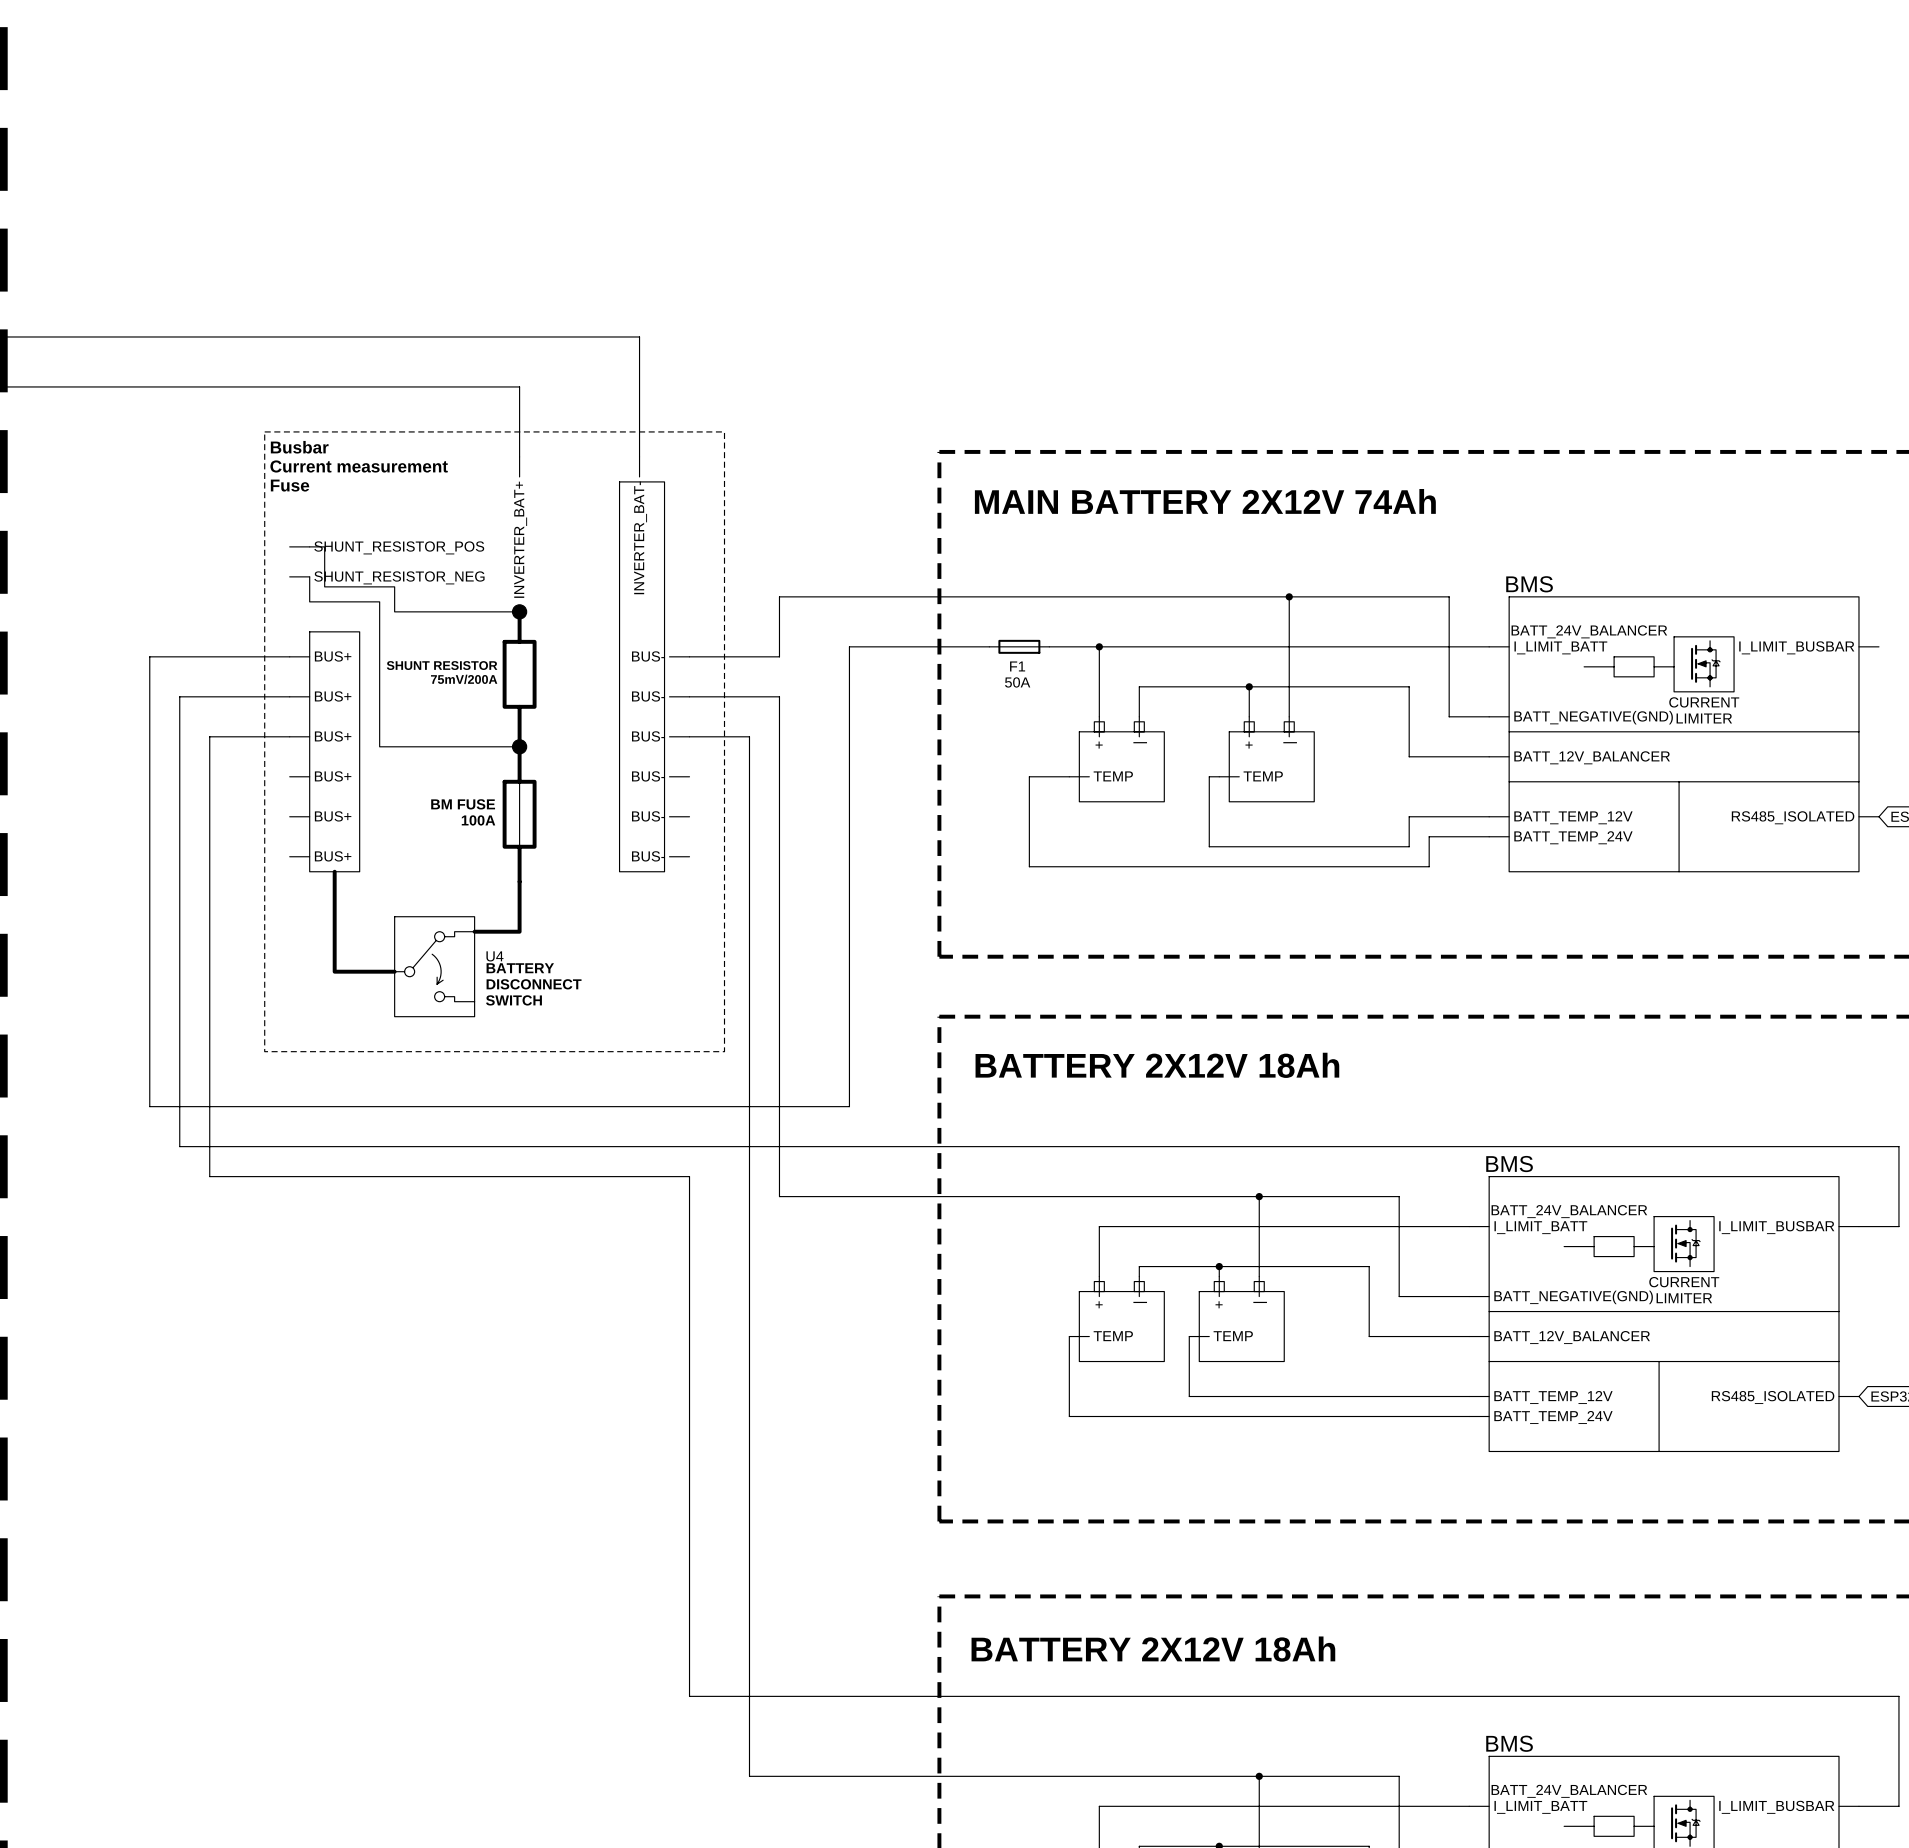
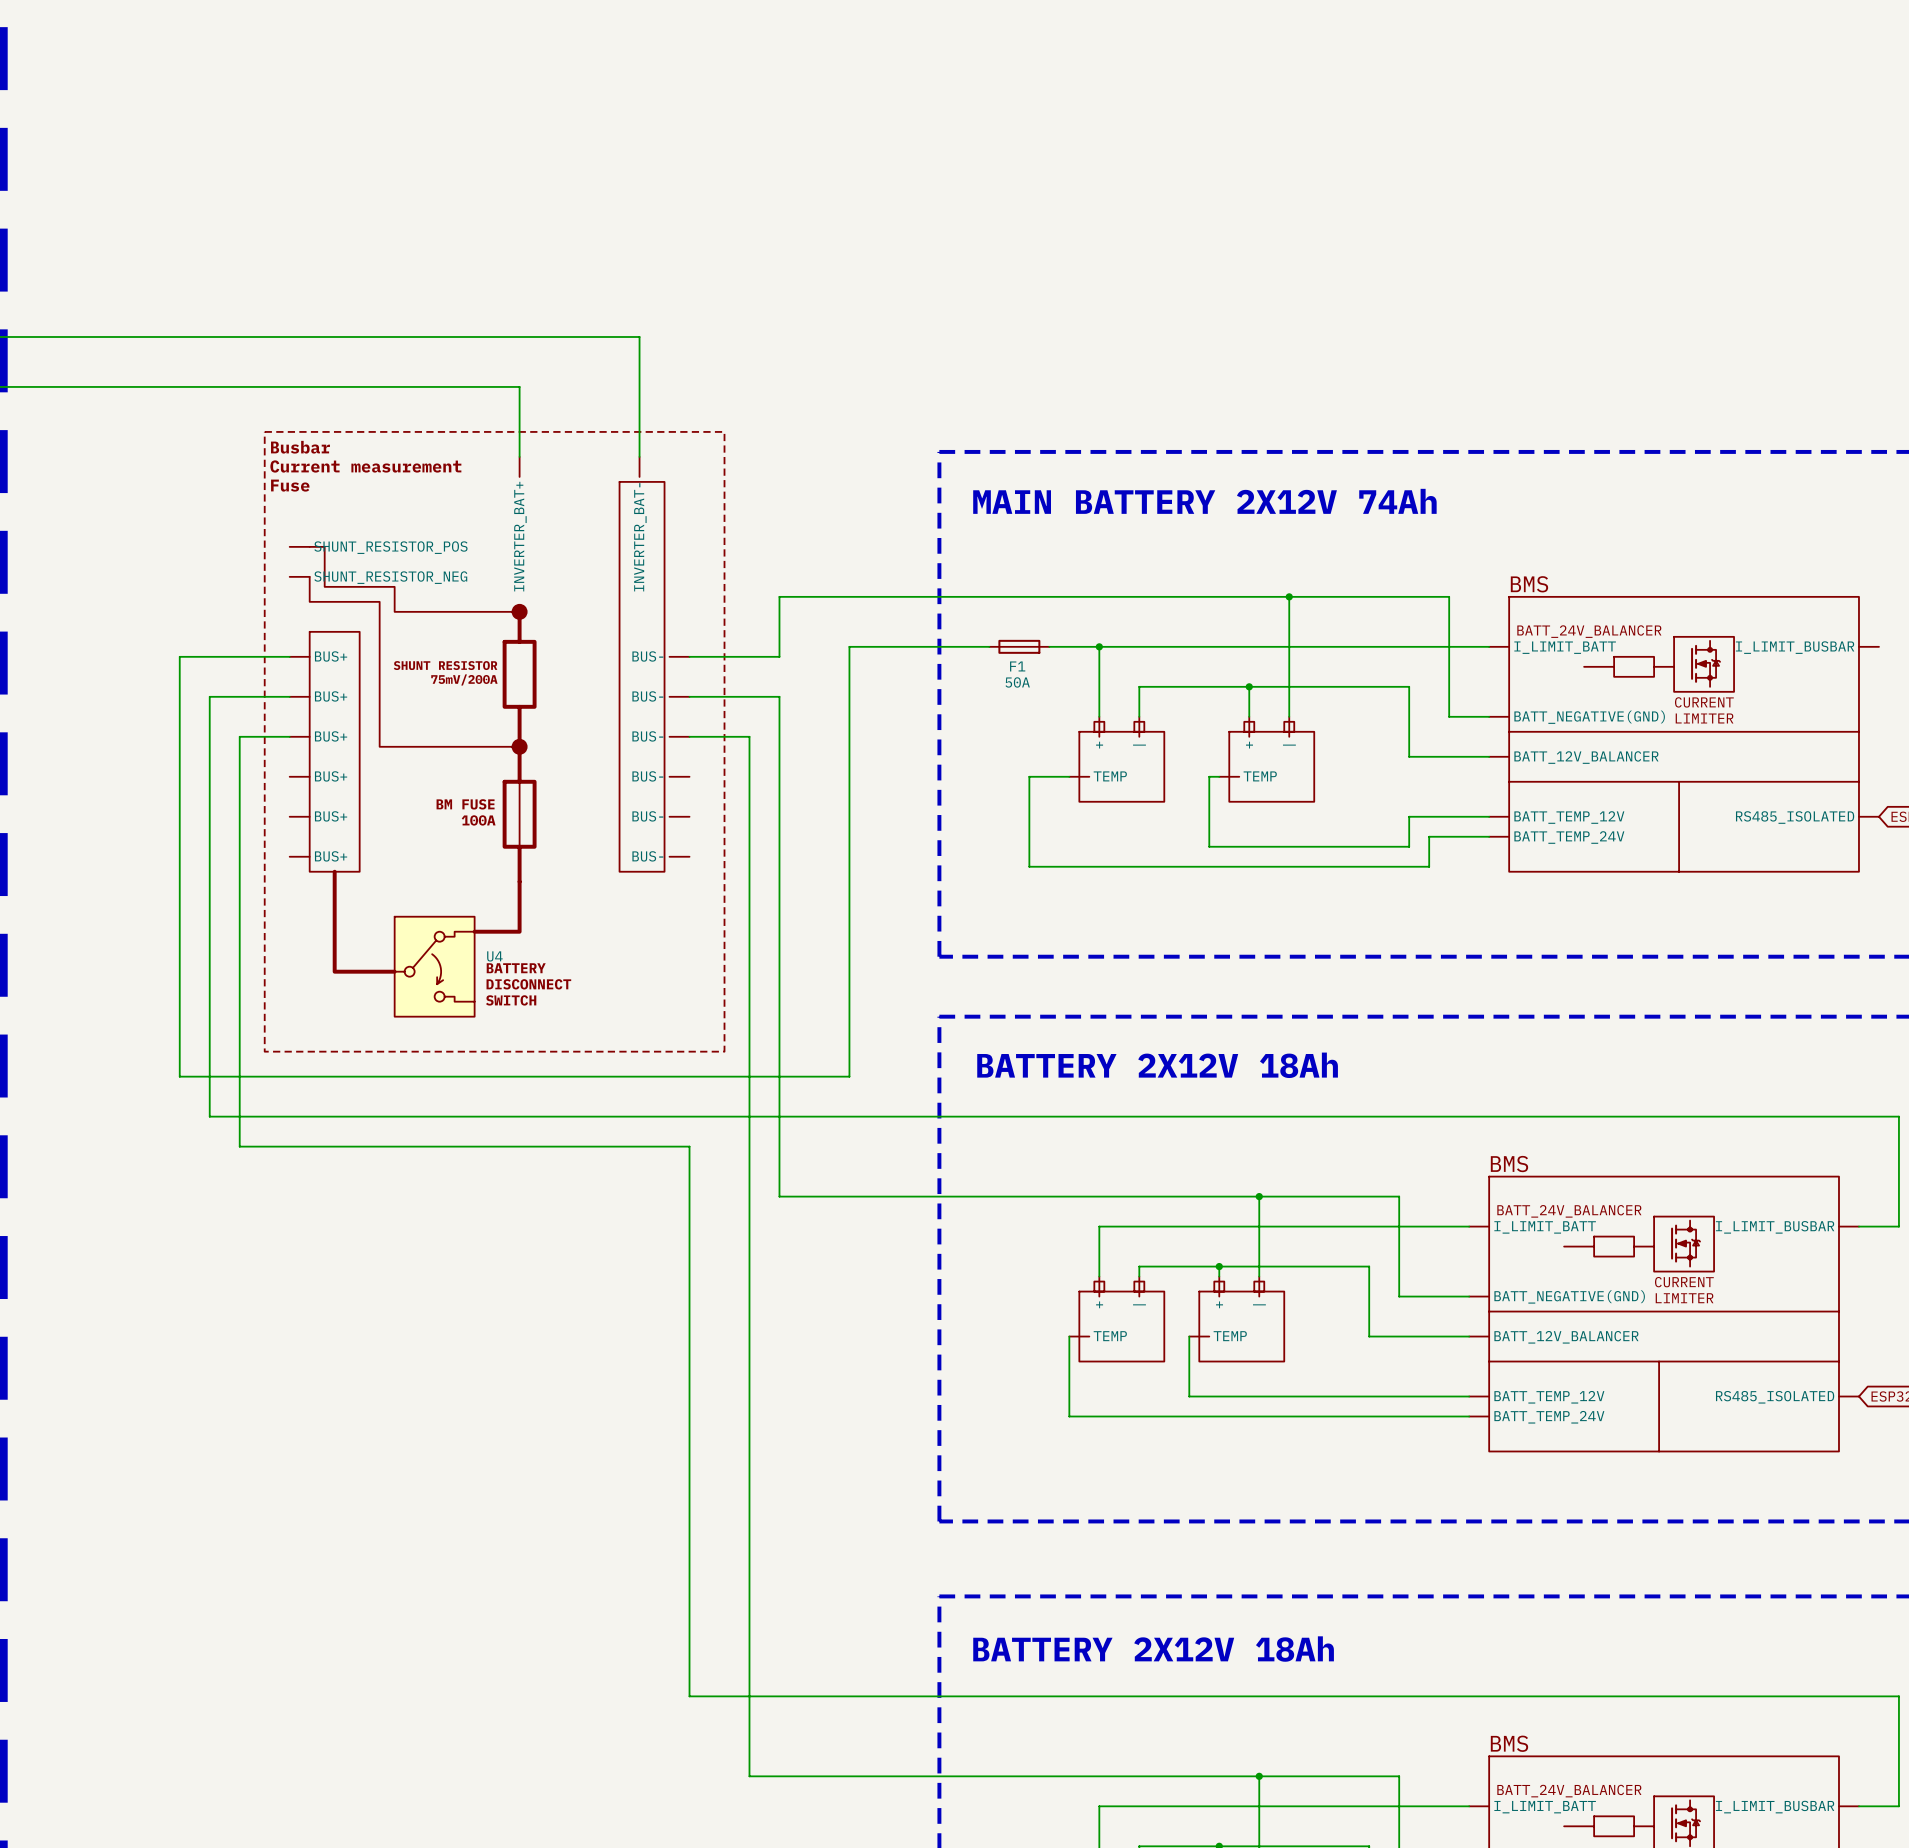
wire: (179, 656) (149, 656) (149, 1106) (849, 1106) (849, 1076) -> (179, 1076) (849, 1076)
wire: (179, 696) (209, 696) -> (179, 696) (179, 656)
wire: (209, 736) (239, 736) -> (209, 736) (209, 696)
wire: (179, 1076) (179, 1146) (239, 1146) -> (239, 736) (239, 1146)
wire: (209, 1116) (209, 1176) (689, 1176) -> (689, 1146) (689, 1176)
wire: (689, 1146) (1898, 1146) -> (209, 1116) (1898, 1116) (1898, 1146)

